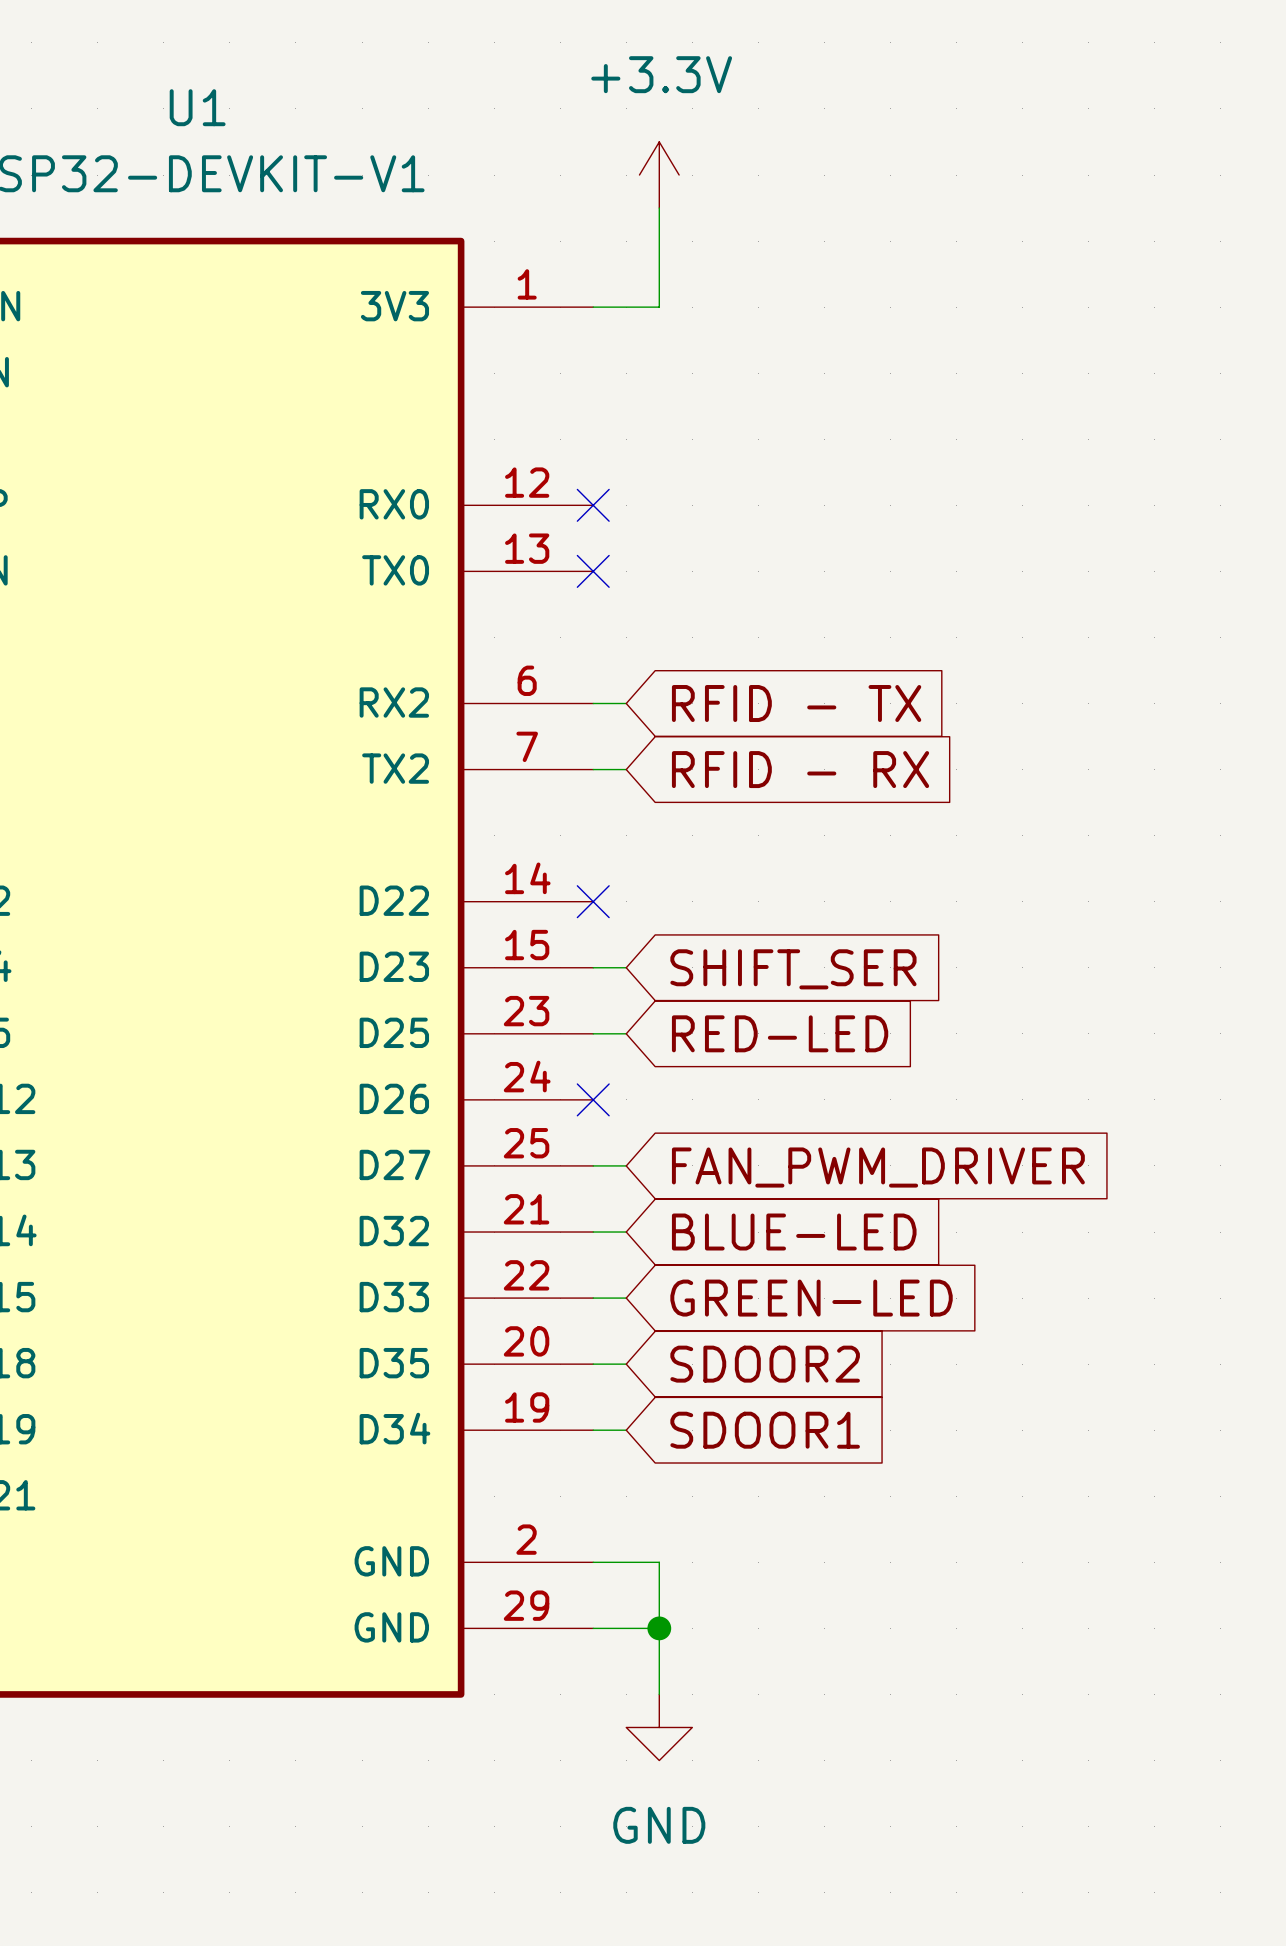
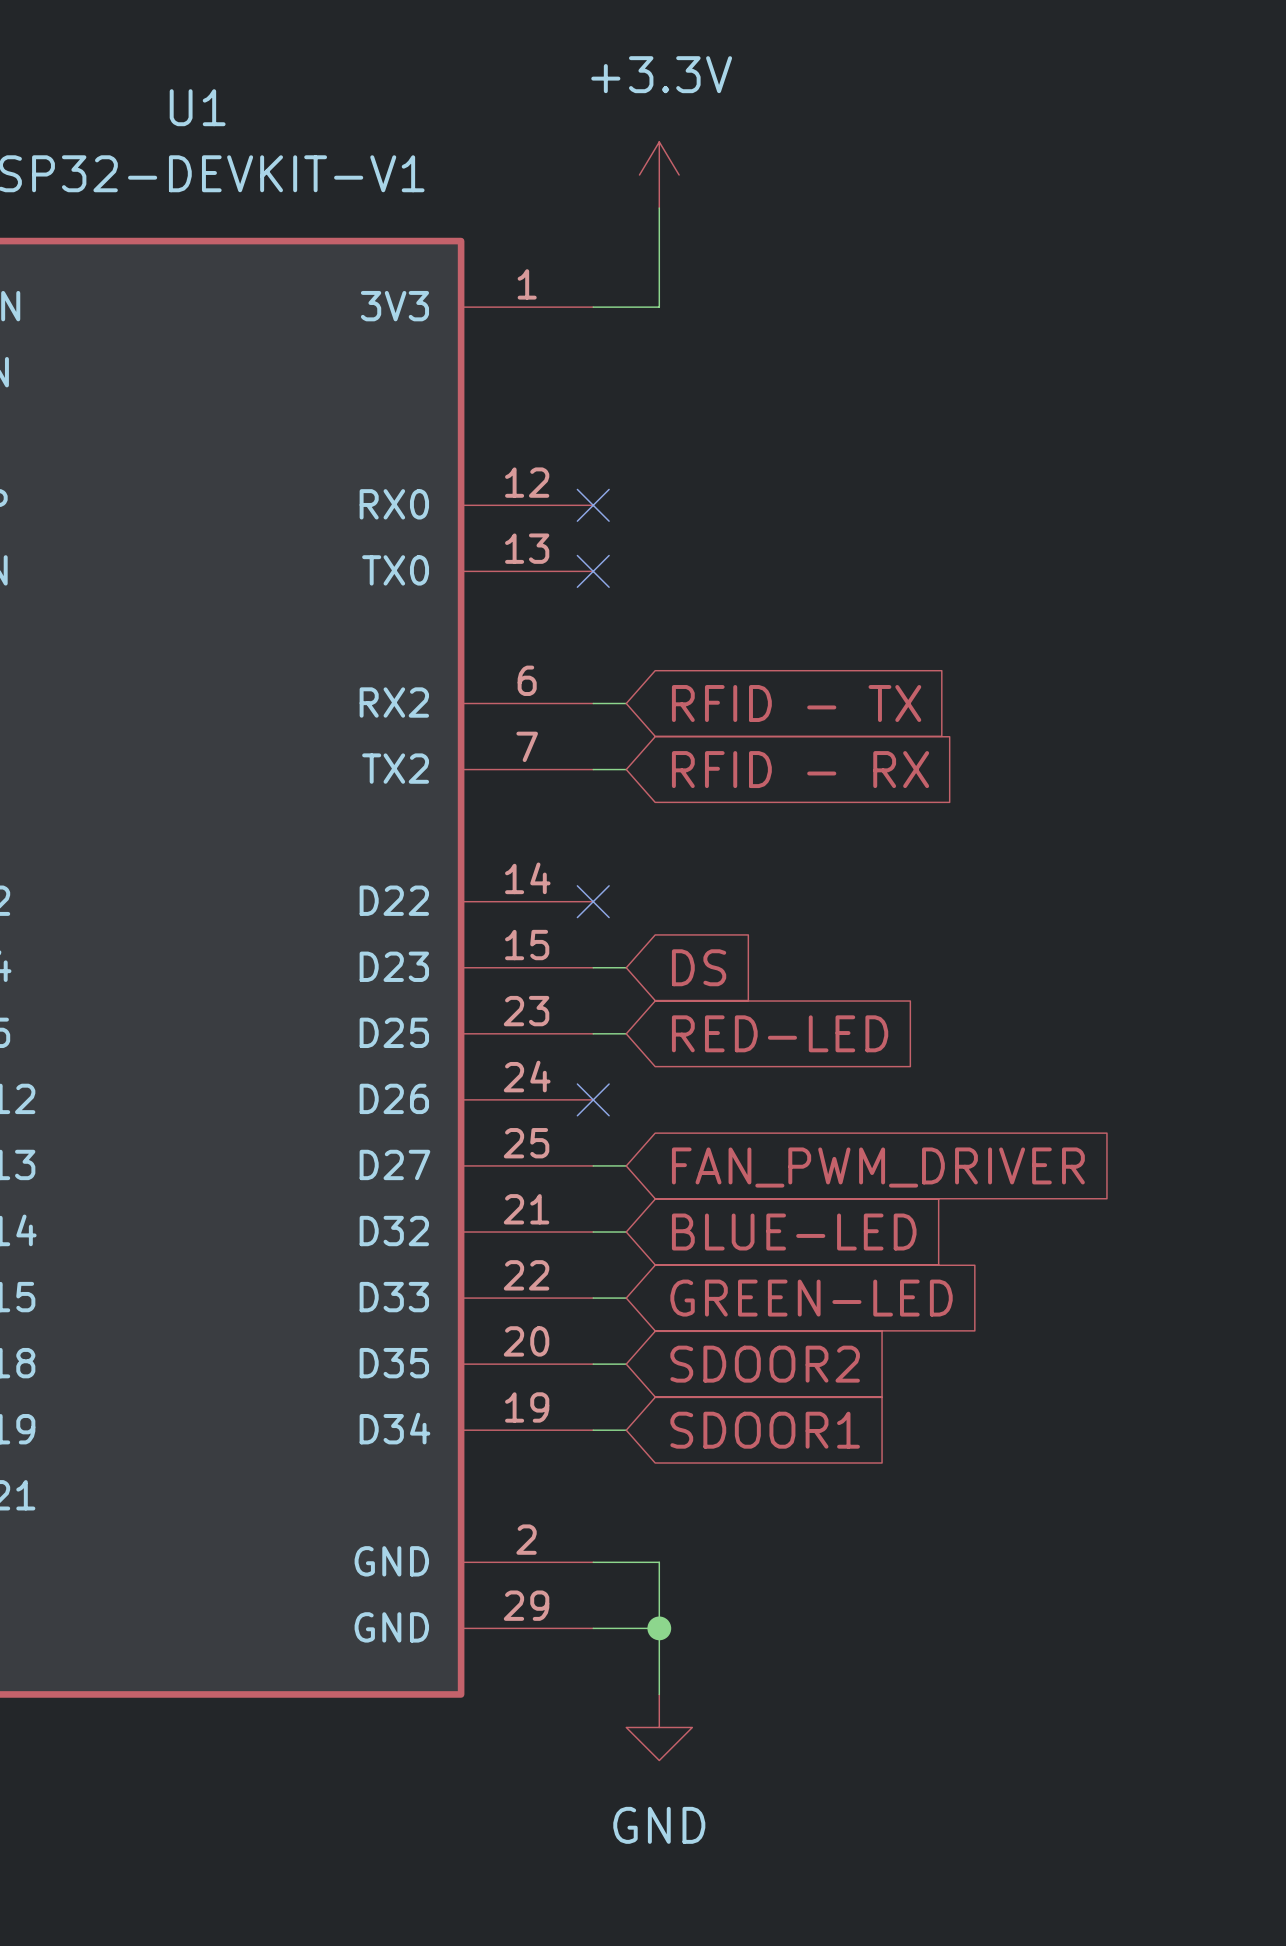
global label: SHIFT_SER (793, 969) -> DS (699, 967)

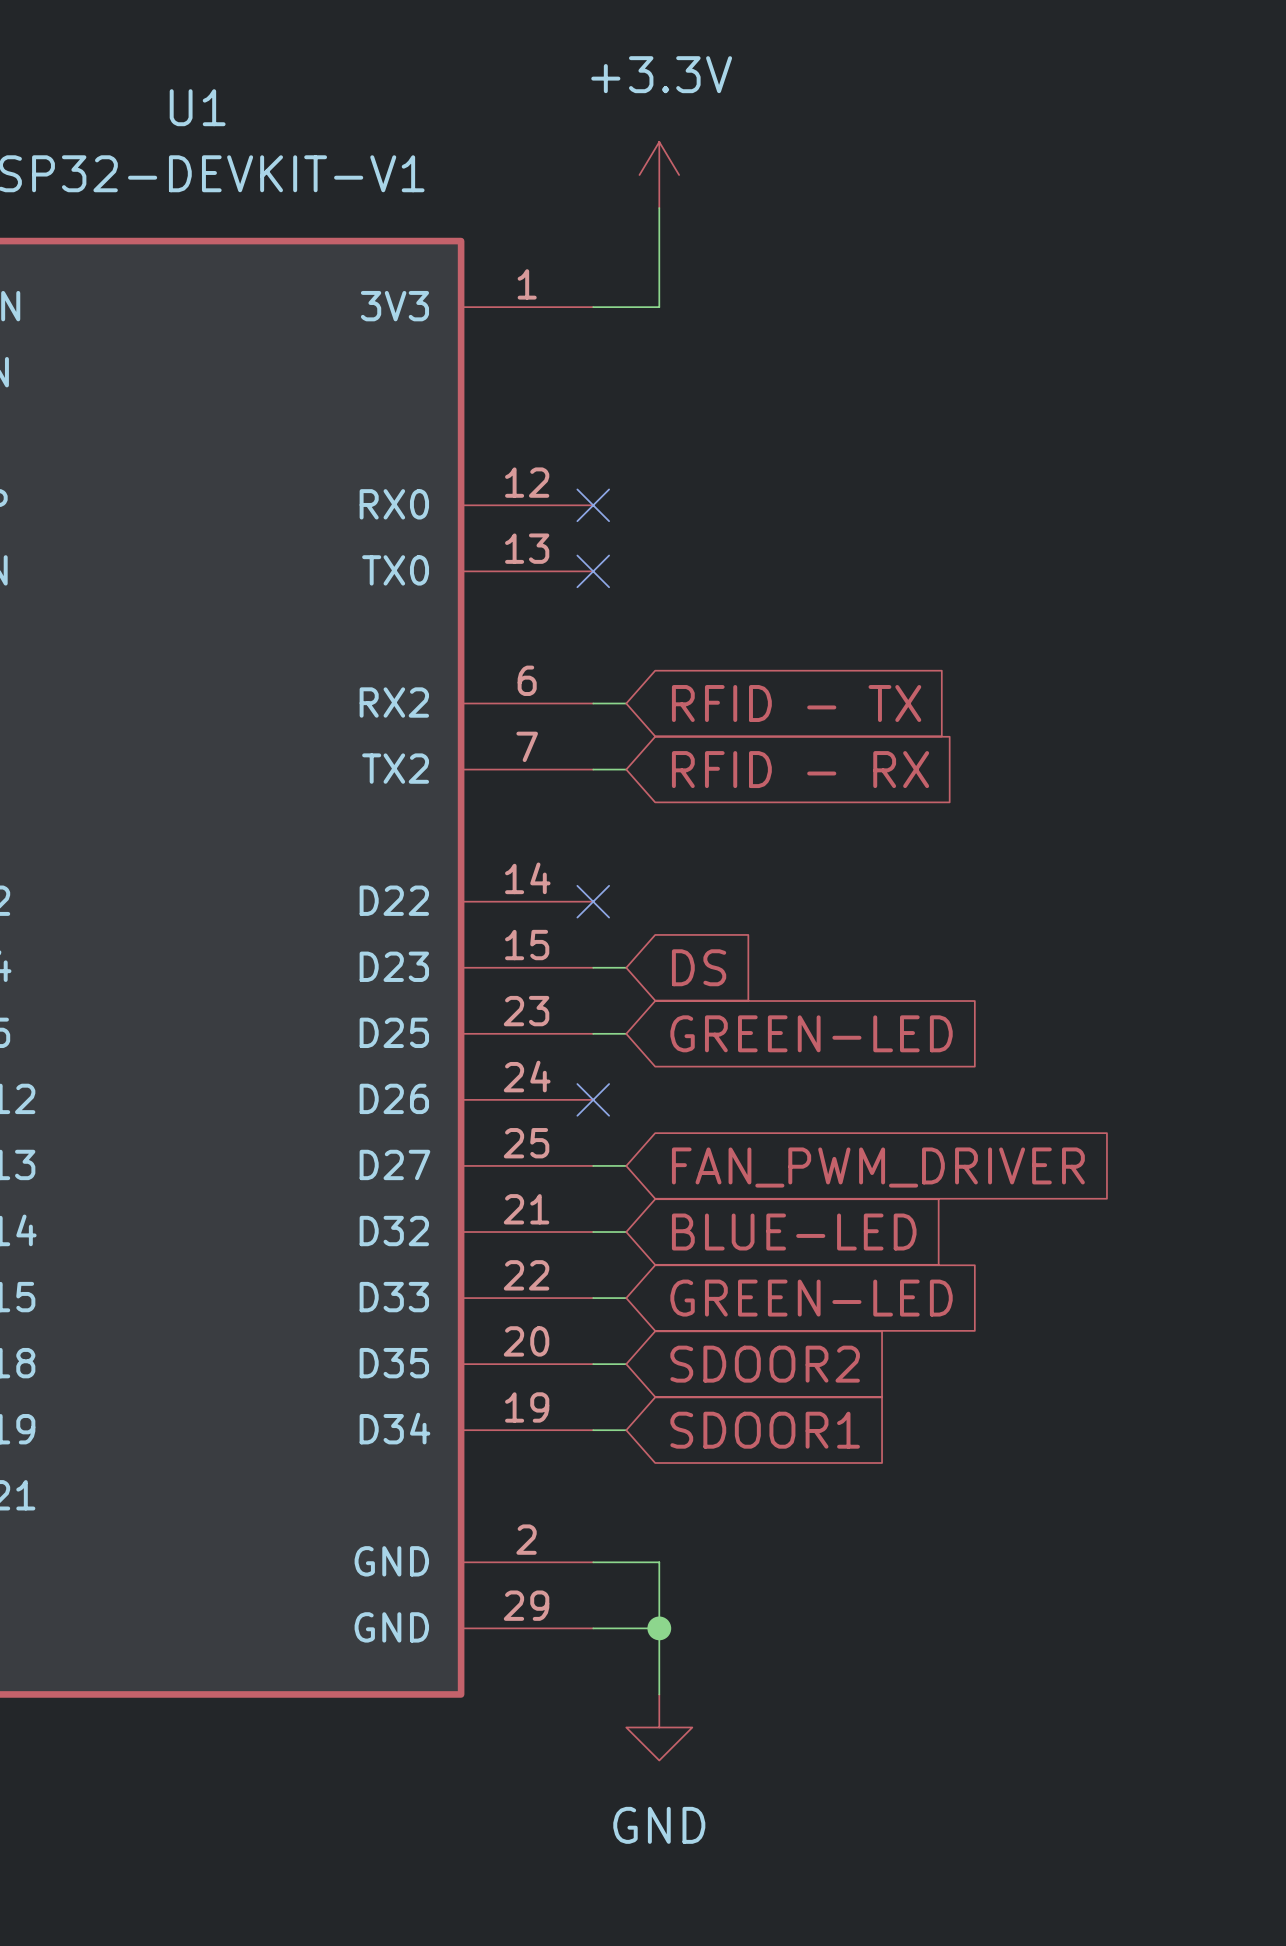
global label: RED-LED (780, 1033) -> GREEN-LED (811, 1033)

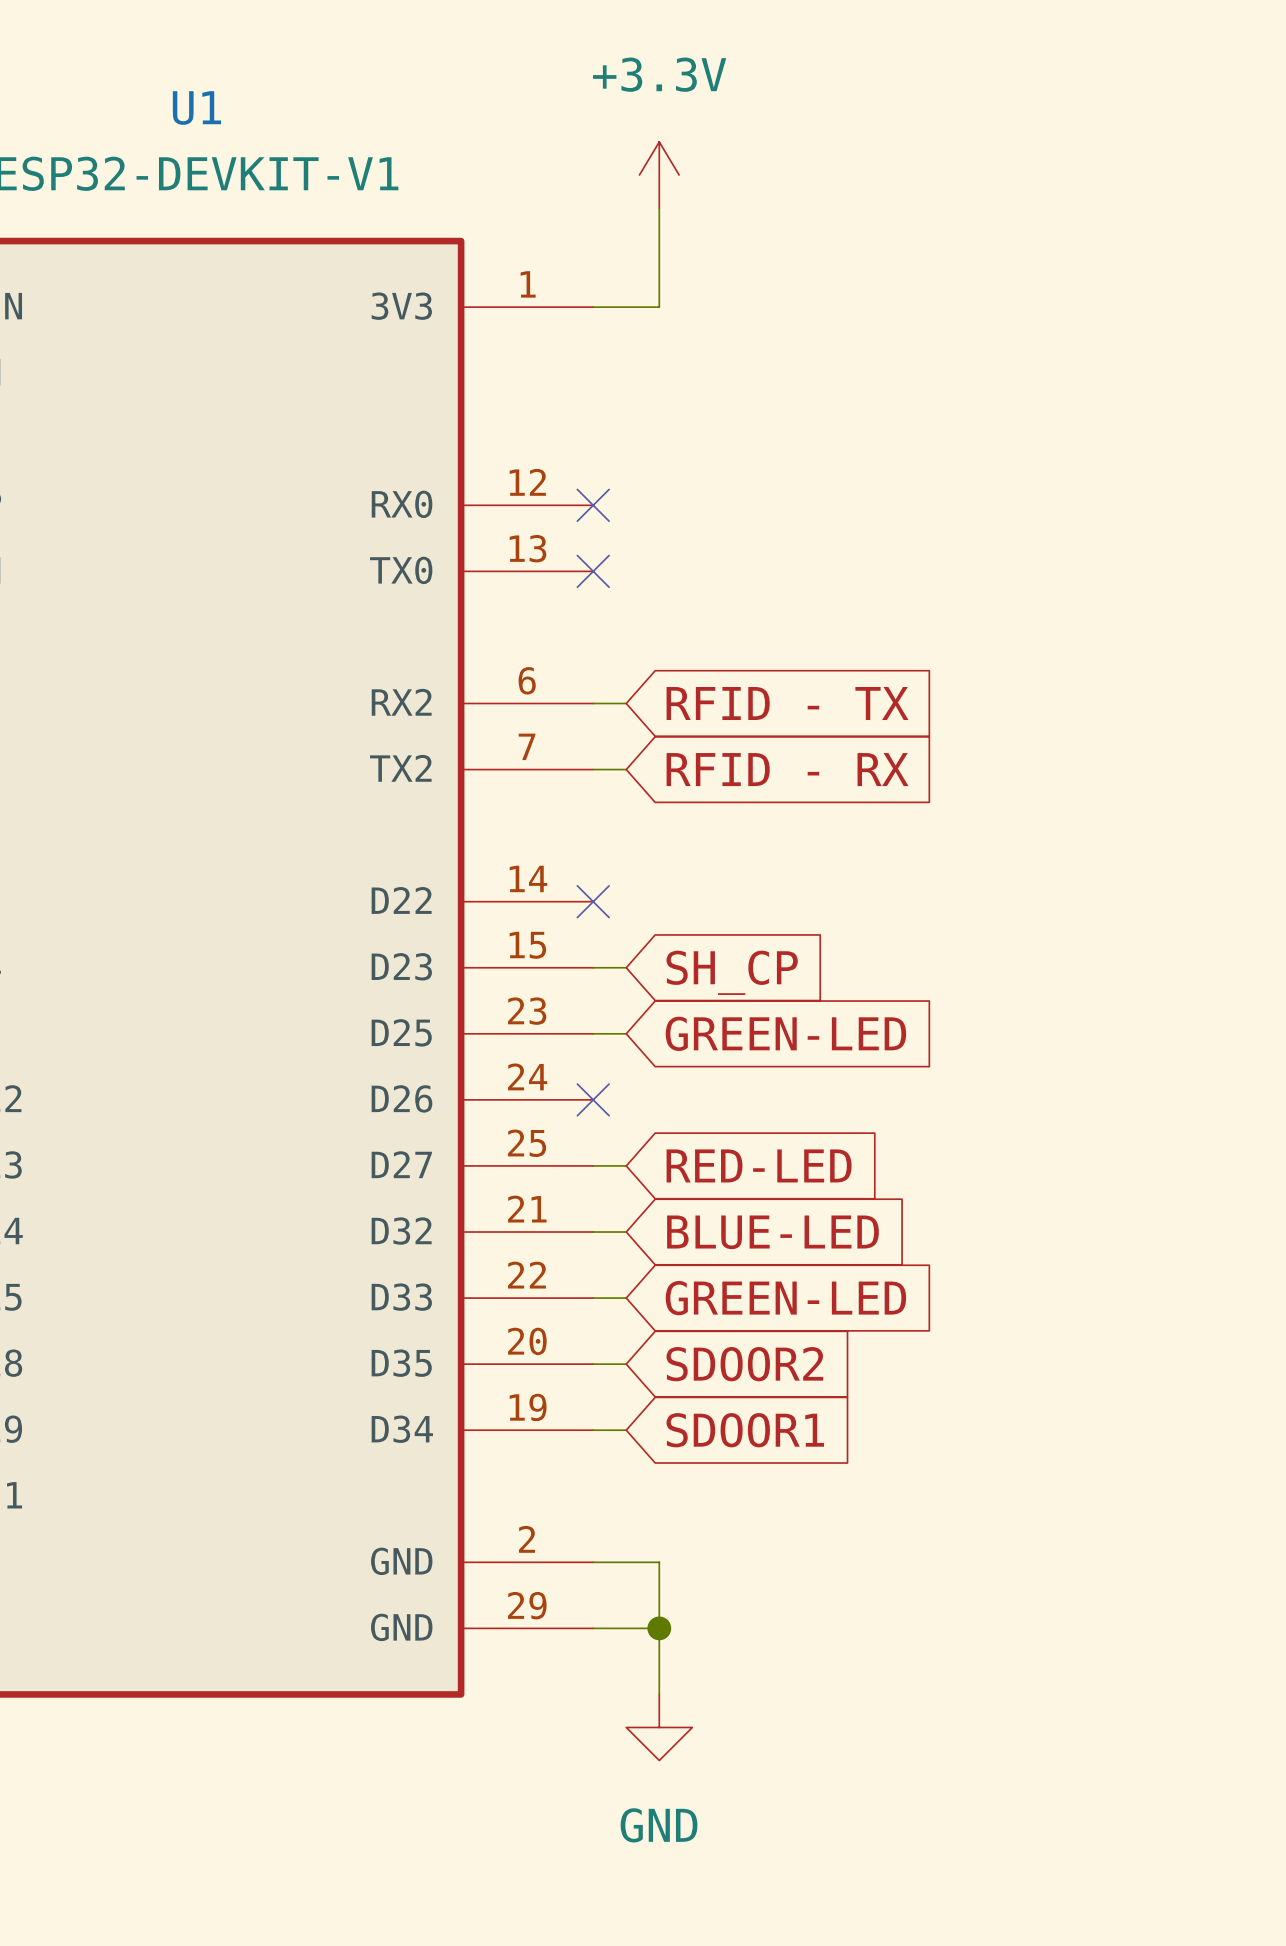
global label: DS (699, 967) -> SH_CP (732, 972)
global label: FAN_PWM_DRIVER (878, 1167) -> RED-LED (759, 1165)

